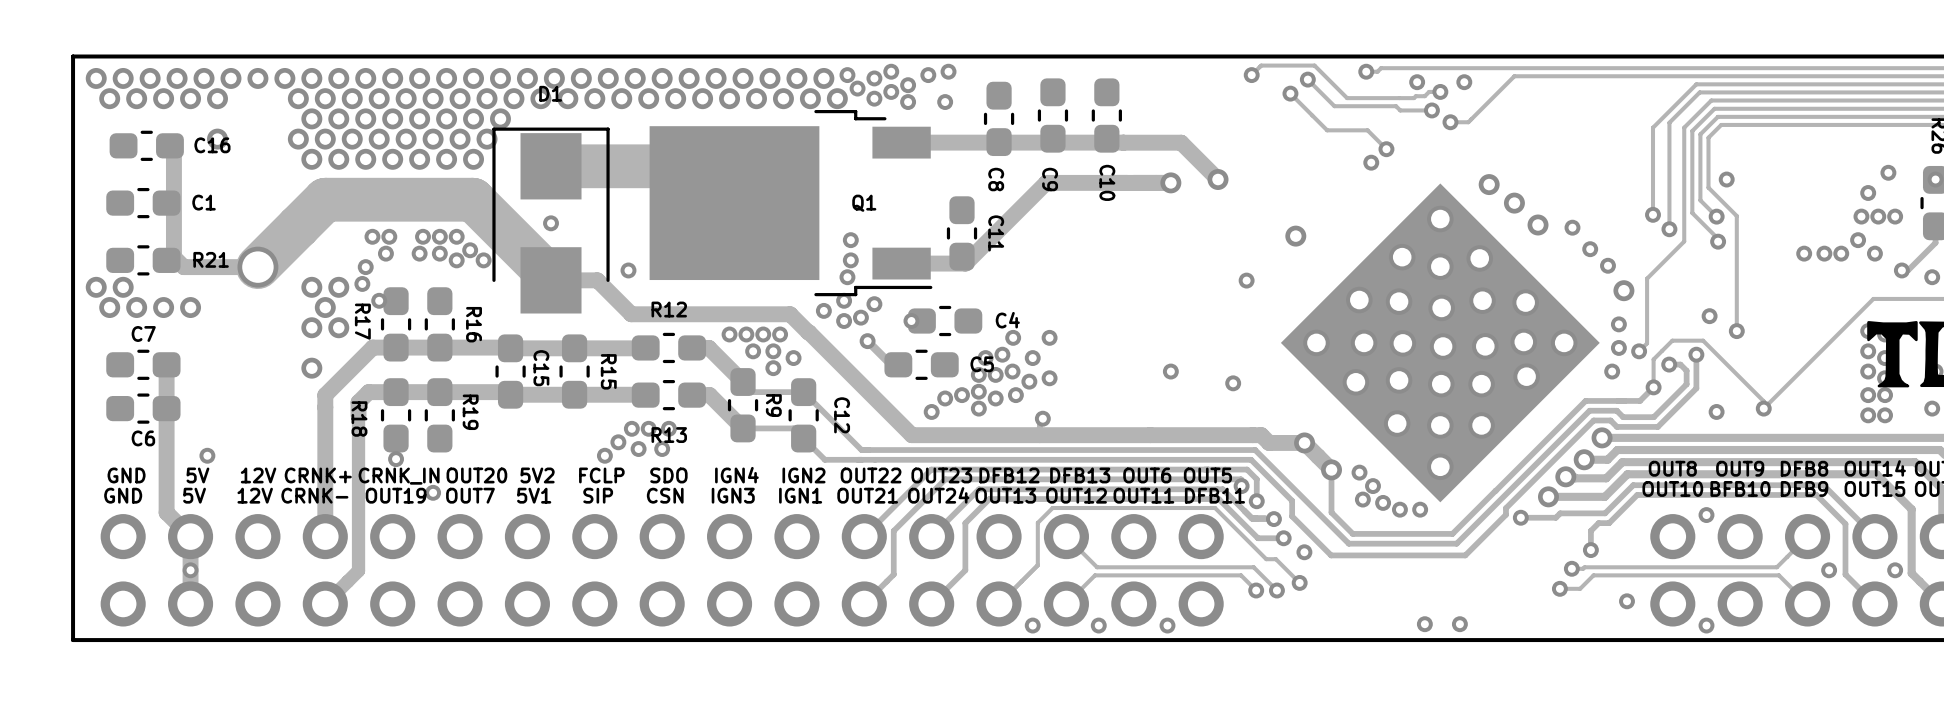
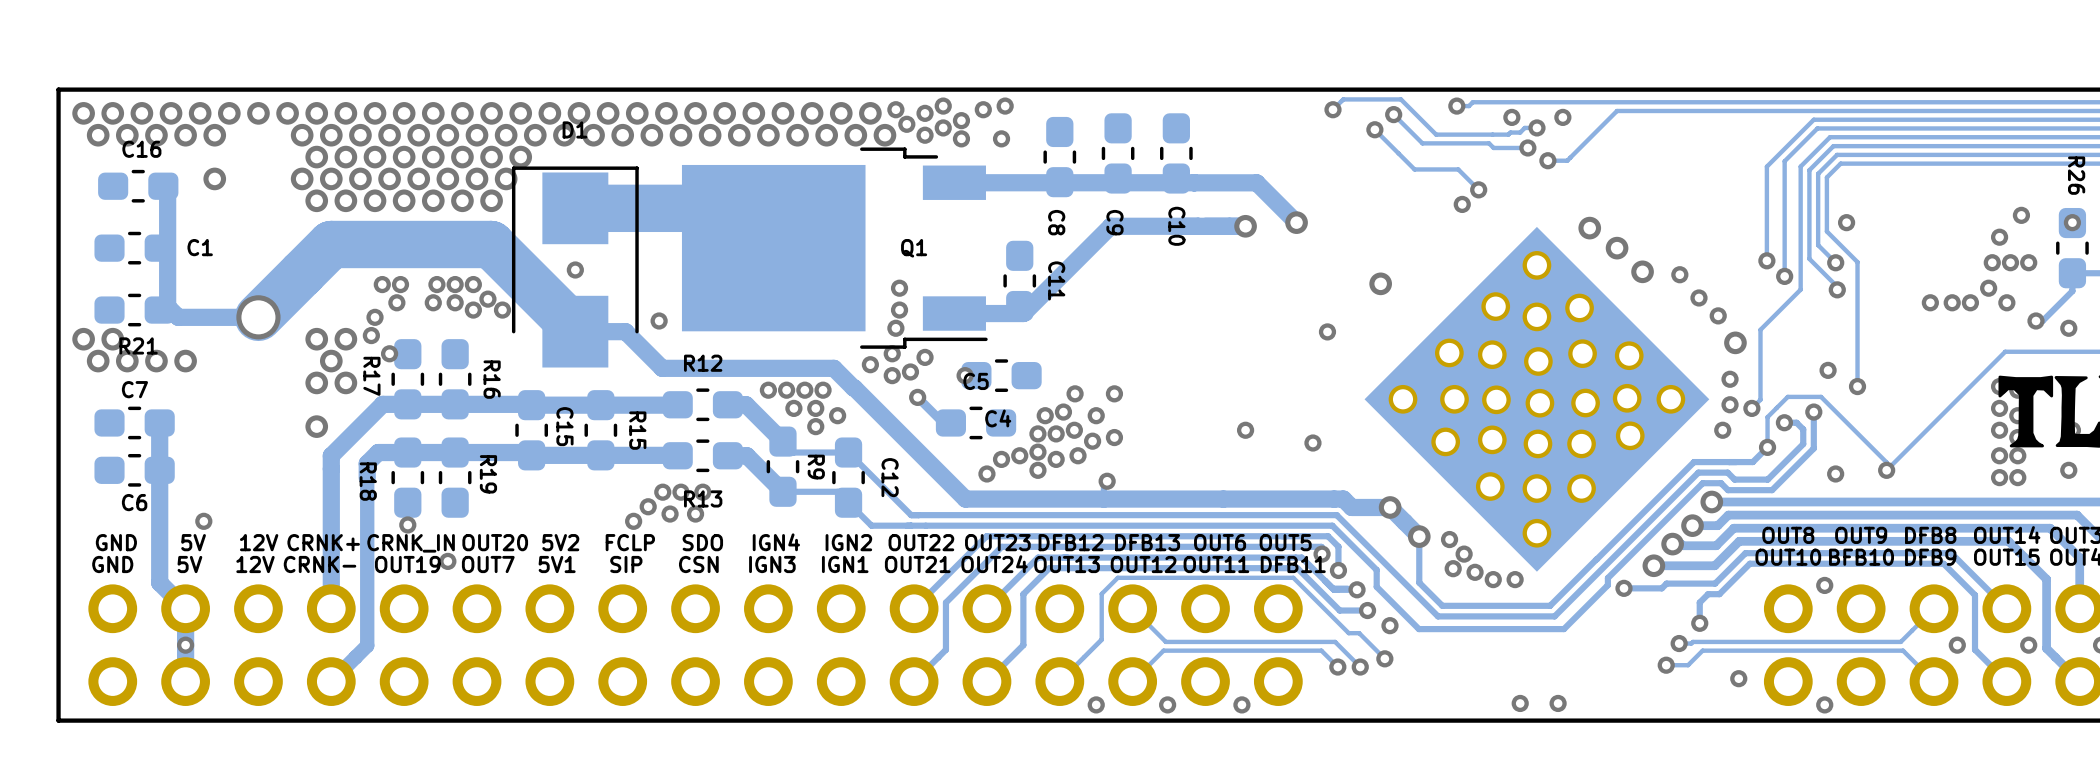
C16 name position: C16 (212, 145) -> C16 (141, 149)
R21 name position: R21 (211, 259) -> R21 (138, 345)
C4 name position: C4 (1007, 320) -> C4 (998, 418)
C5 name position: C5 (982, 364) -> C5 (976, 381)

